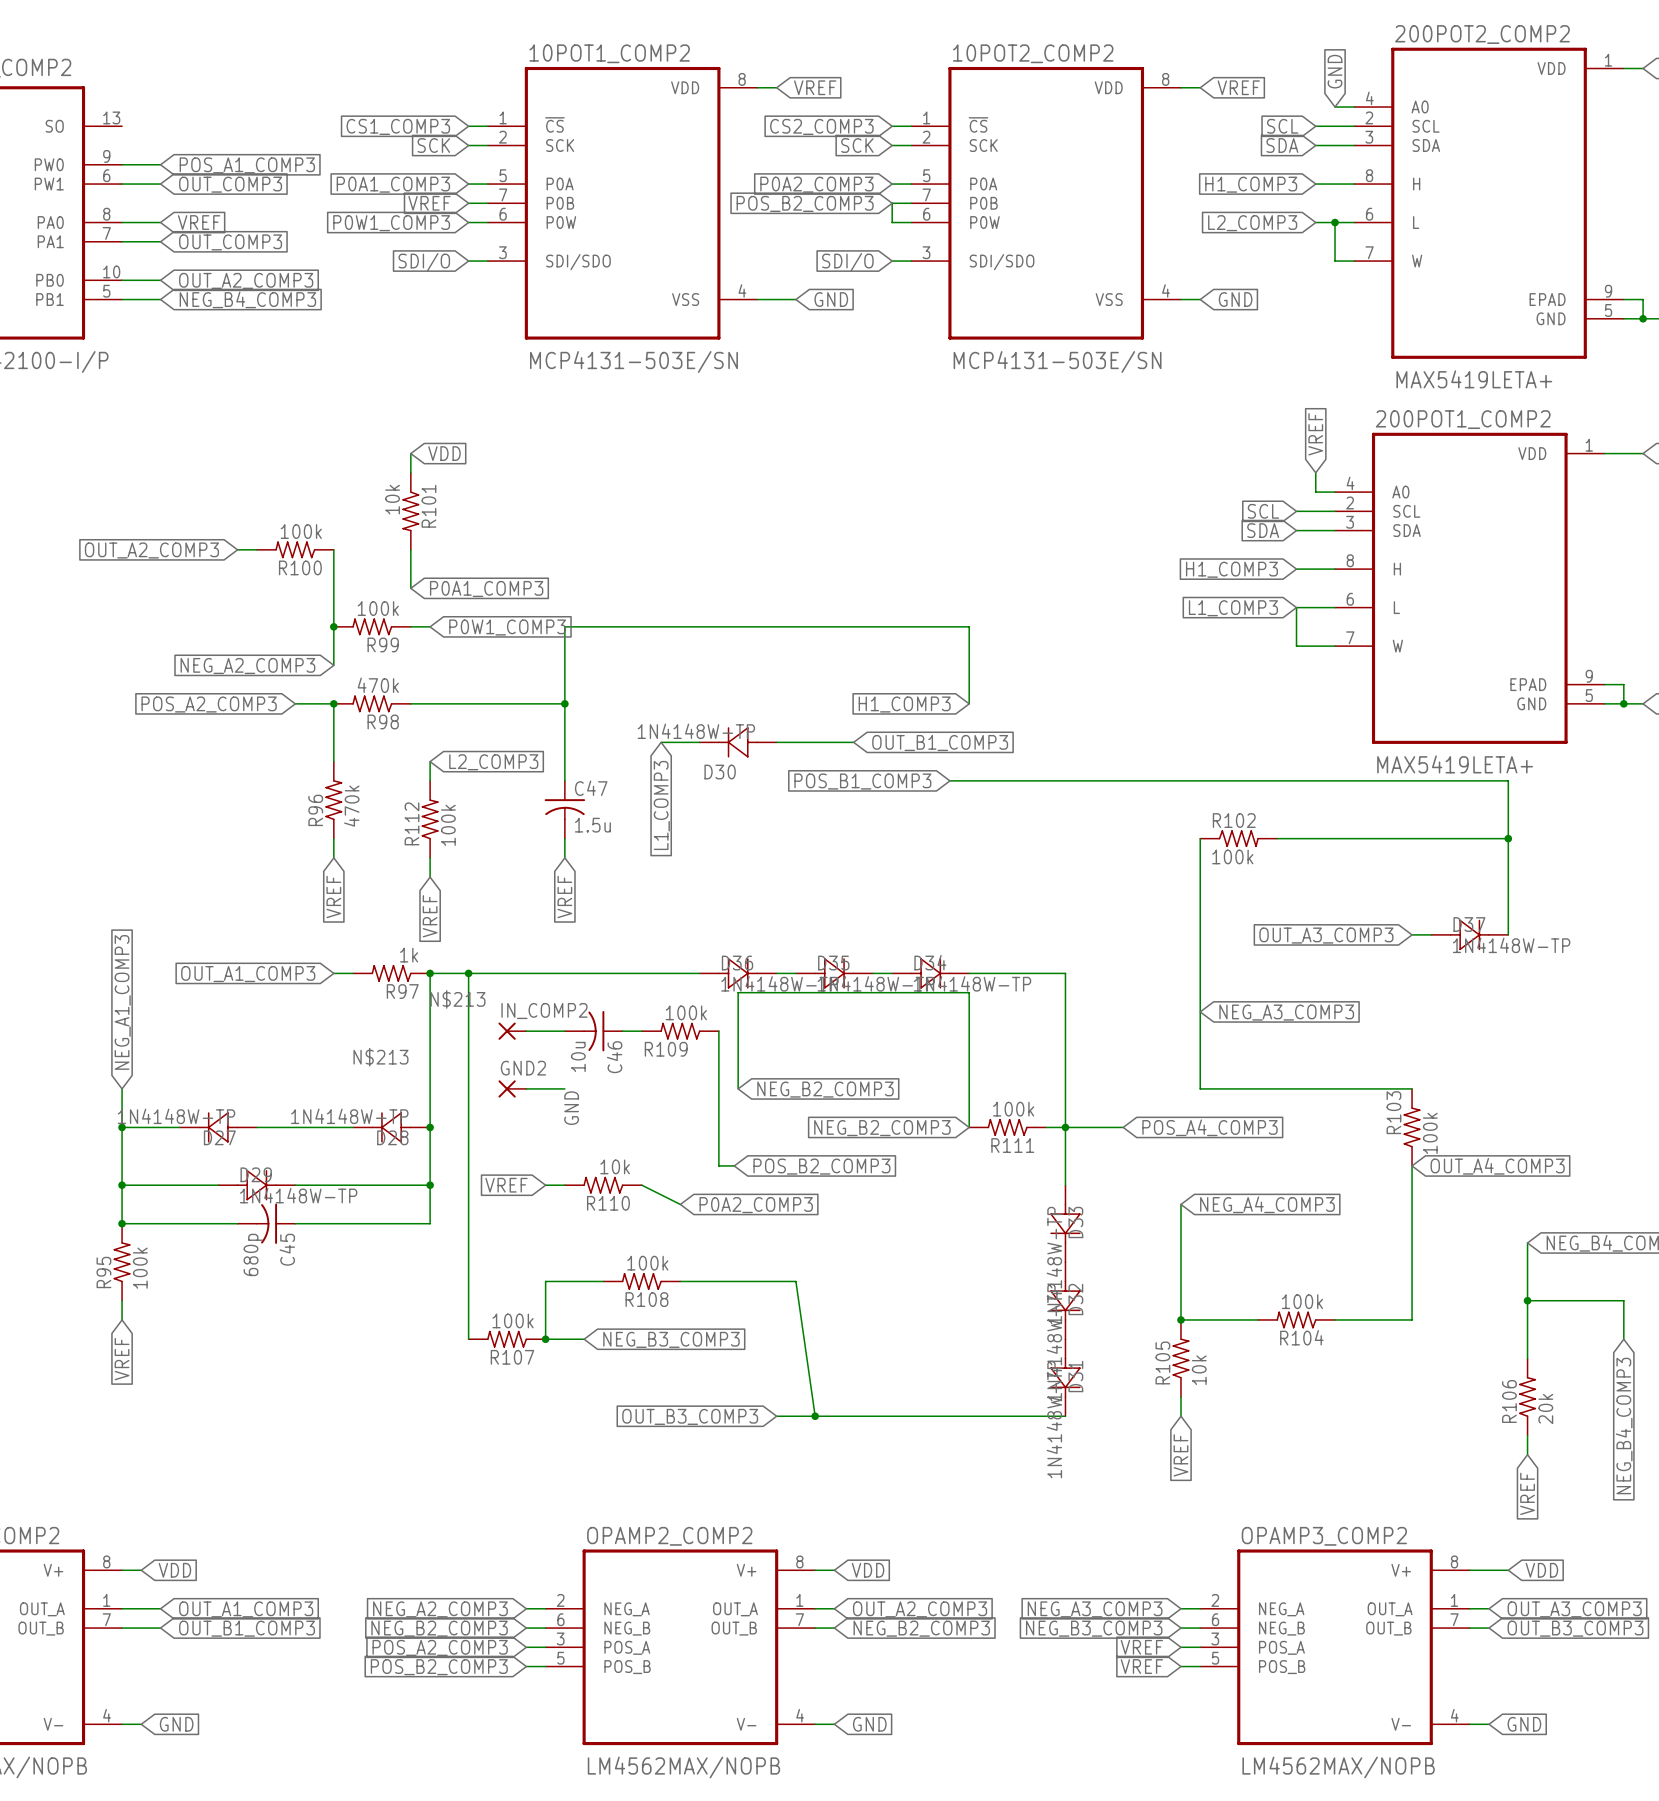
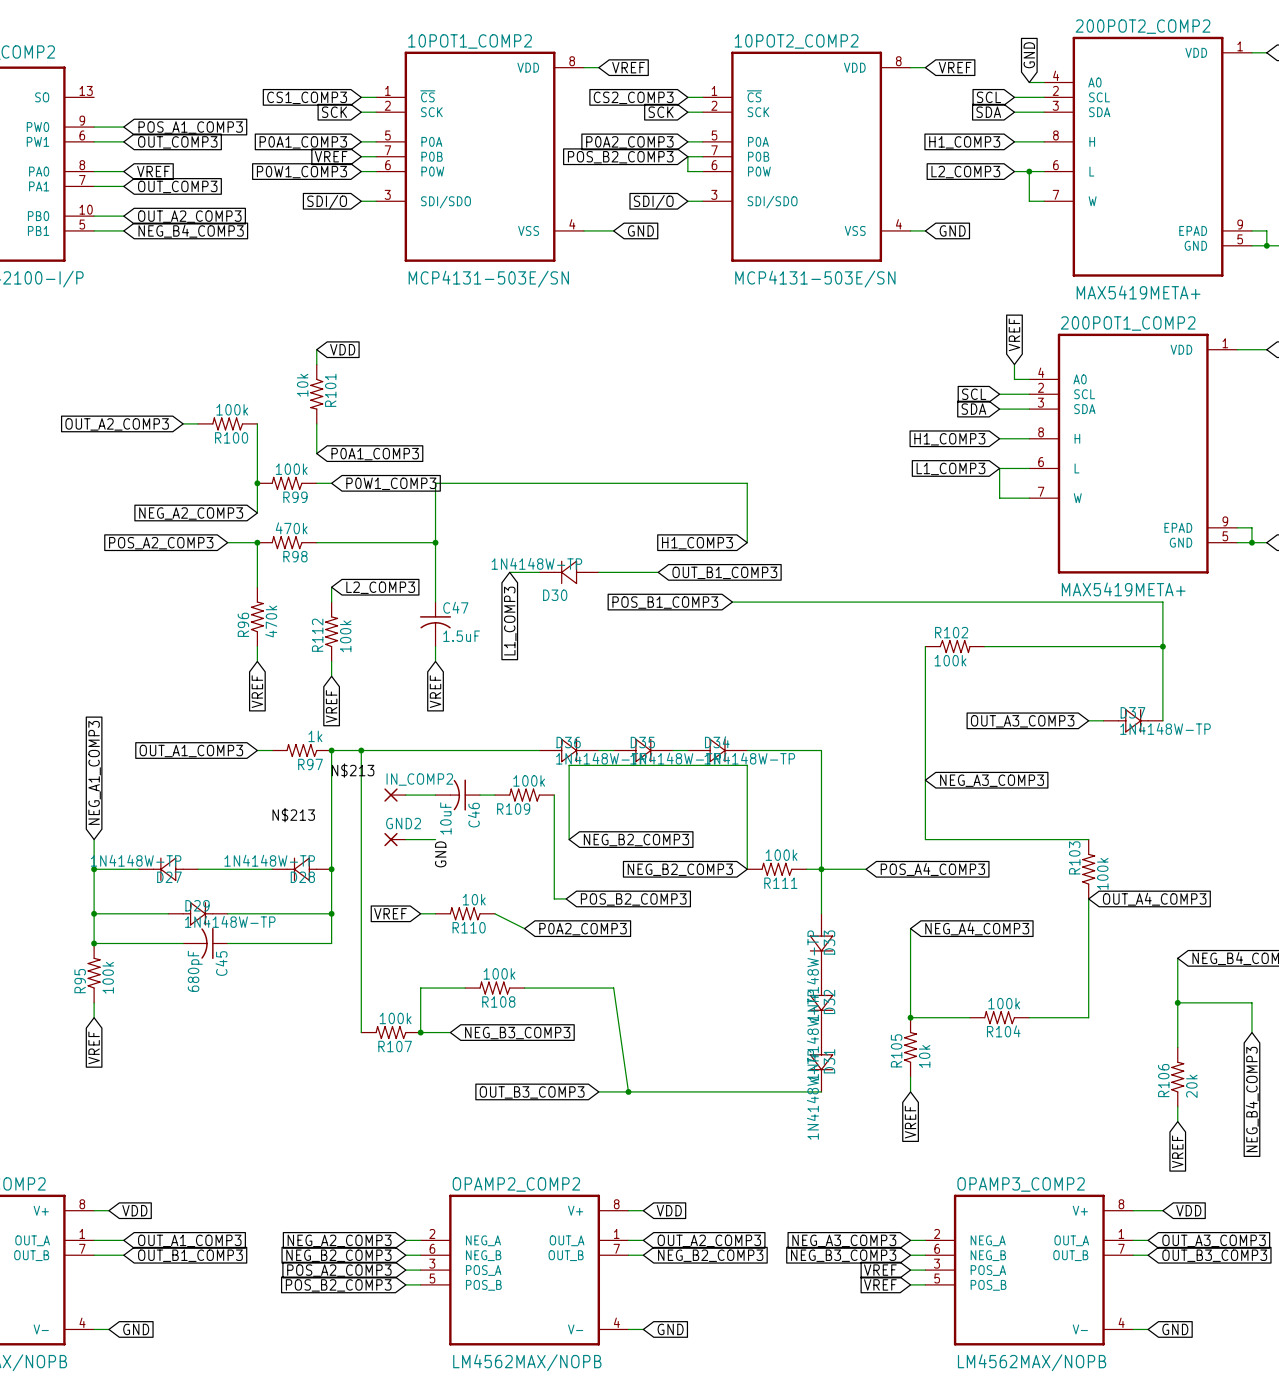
200POT2_COMP2 value: MAX5419LETA+ (1474, 379) -> MAX5419META+ (1138, 292)
200POT1_COMP2 value: MAX5419LETA+ (1455, 764) -> MAX5419META+ (1123, 589)
C47 value: 1.5u (592, 825) -> 1.5uF (461, 636)
C46 value: 10u (578, 1056) -> 10uF (445, 818)
C45 value: 680p (253, 1254) -> 680pF (195, 971)

